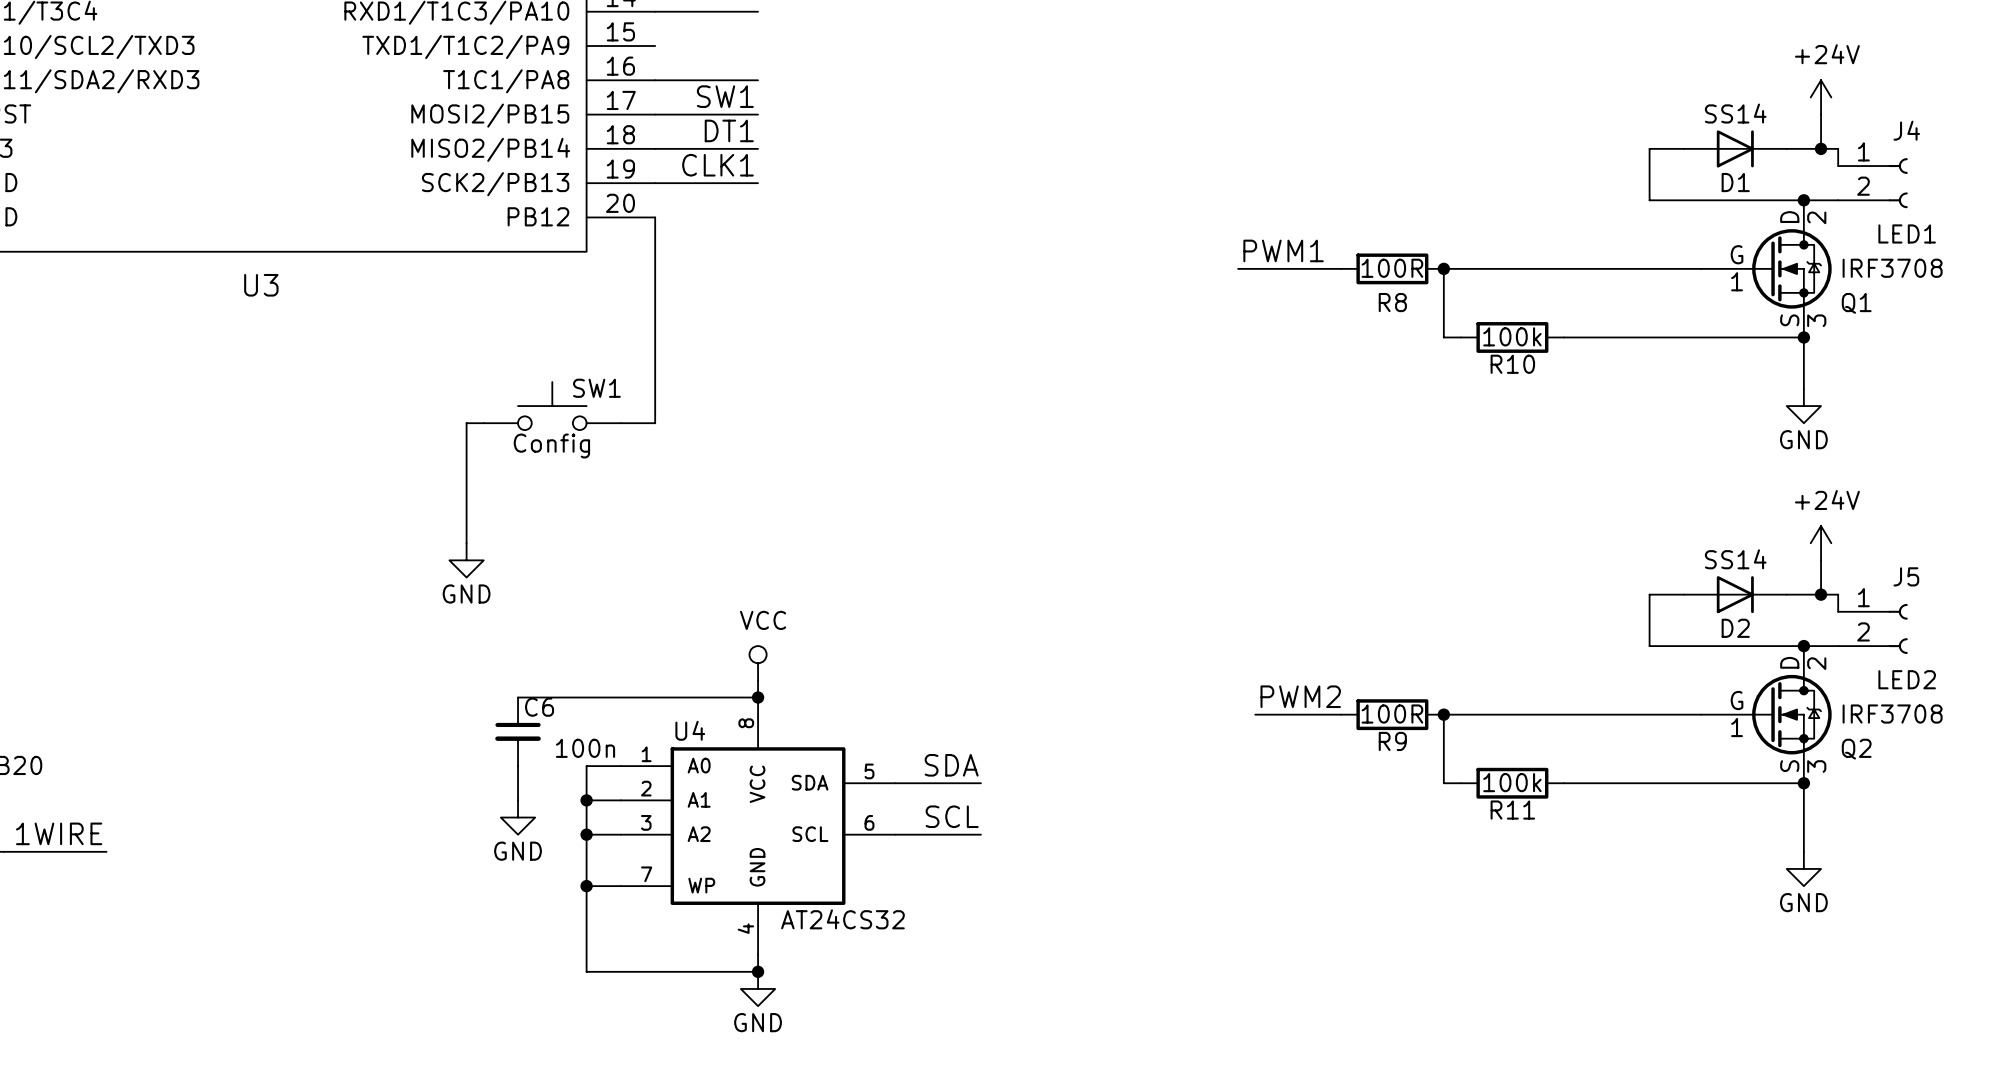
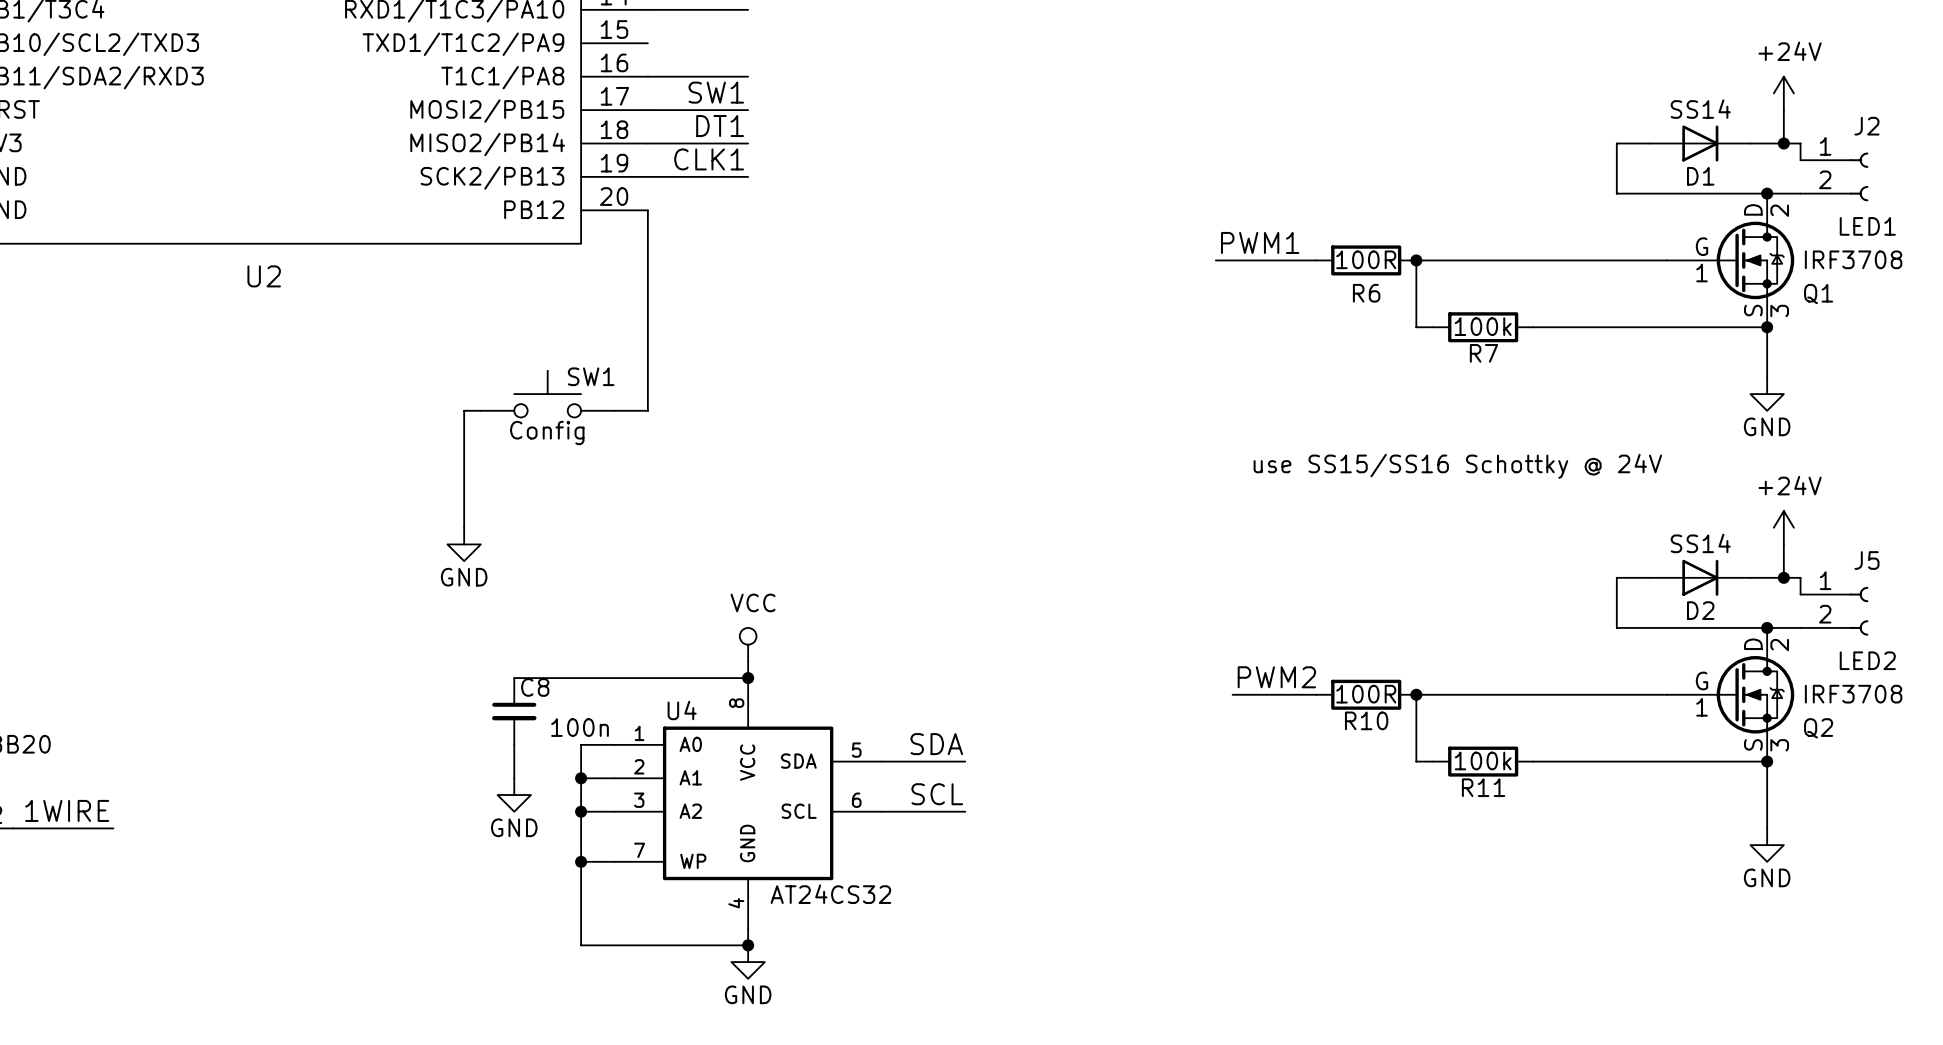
J4 name: J4 (1906, 130) -> J2 (1866, 126)
U3 name: U3 (261, 285) -> U2 (264, 276)
R8 name: R8 (1392, 302) -> R6 (1366, 293)
R10 name: R10 (1512, 364) -> R7 (1483, 353)
text: none -> use SS15/SS16 Schottky @ 24V (1457, 466)
C6 name: C6 (539, 707) -> C8 (535, 687)
R9 name: R9 (1392, 741) -> R10 (1366, 720)

